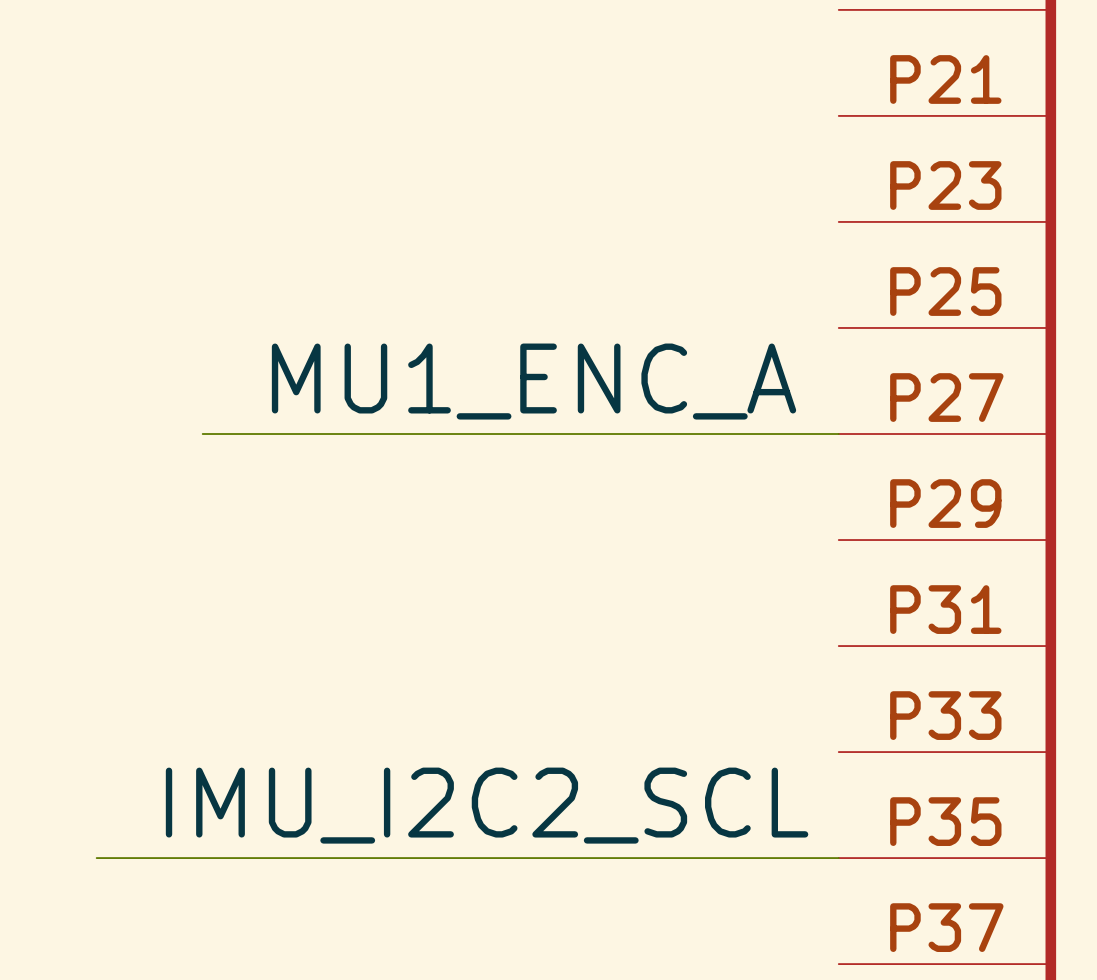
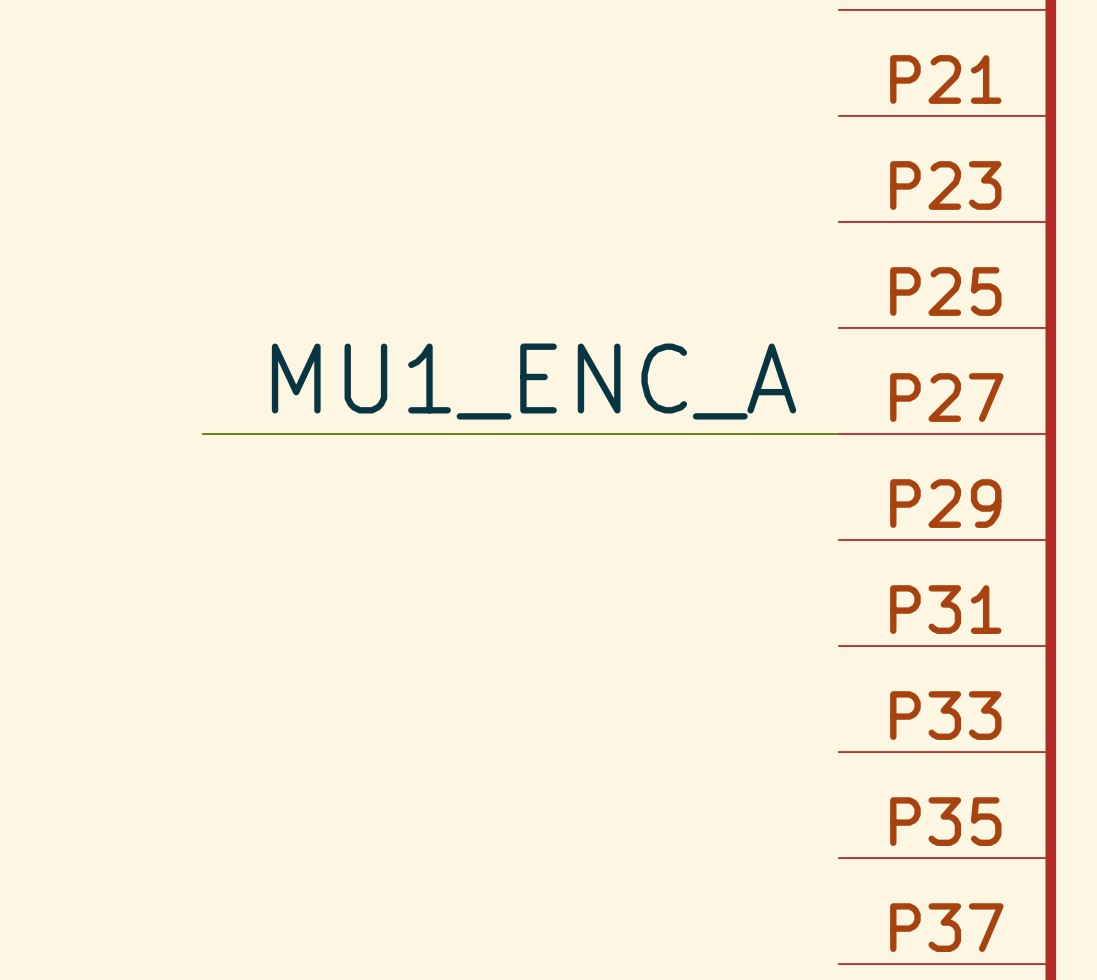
label: IMU_I2C2_SCL (487, 805) -> none
wire: (96, 858) (838, 858) -> none

